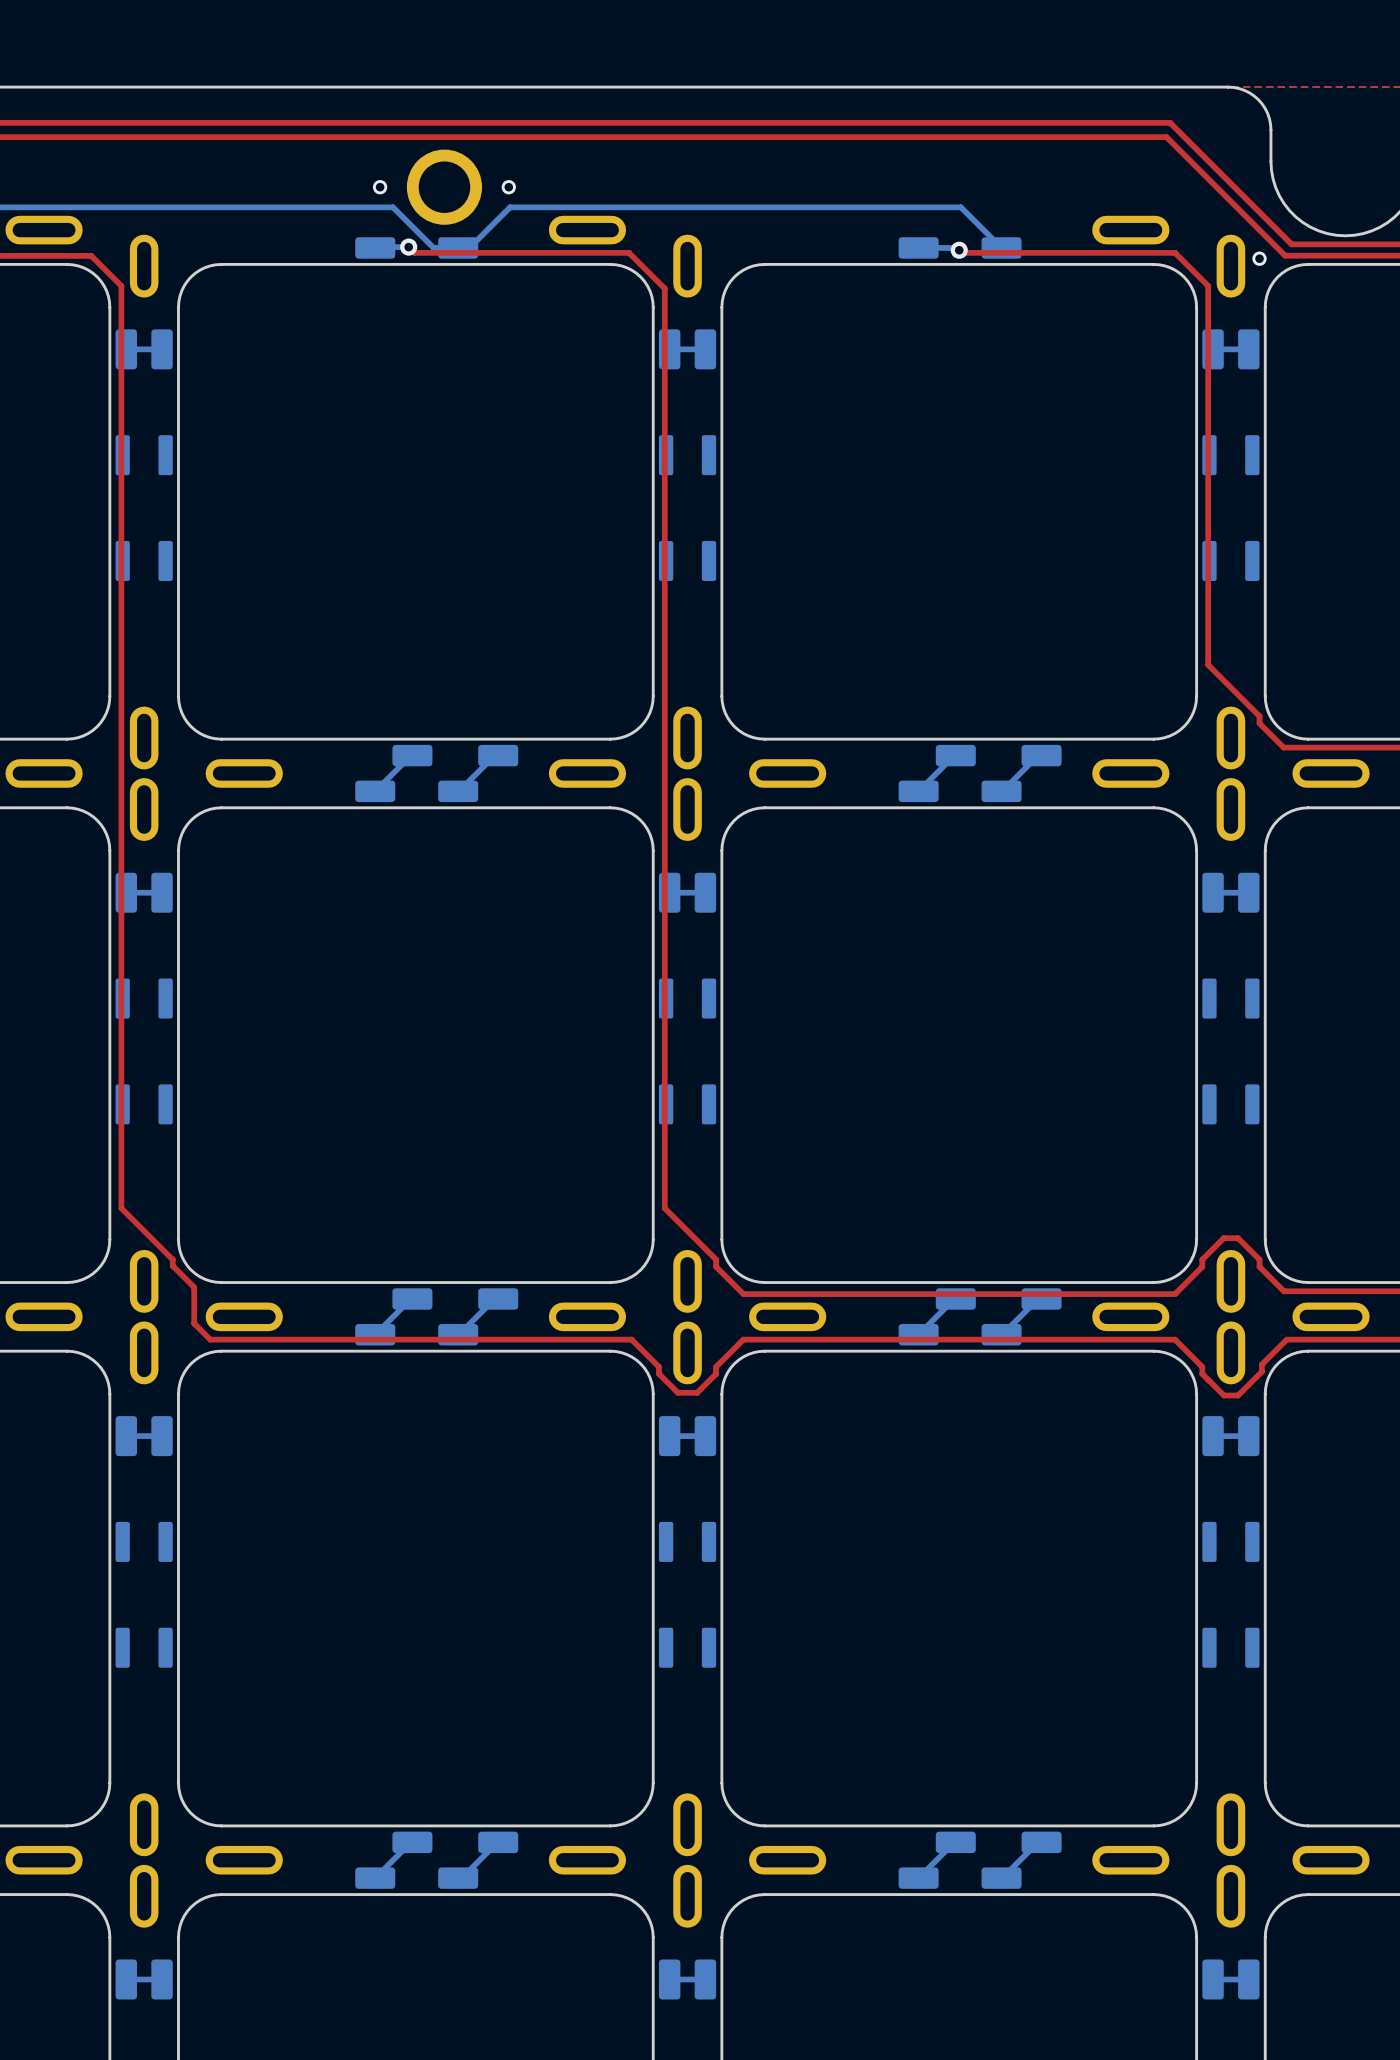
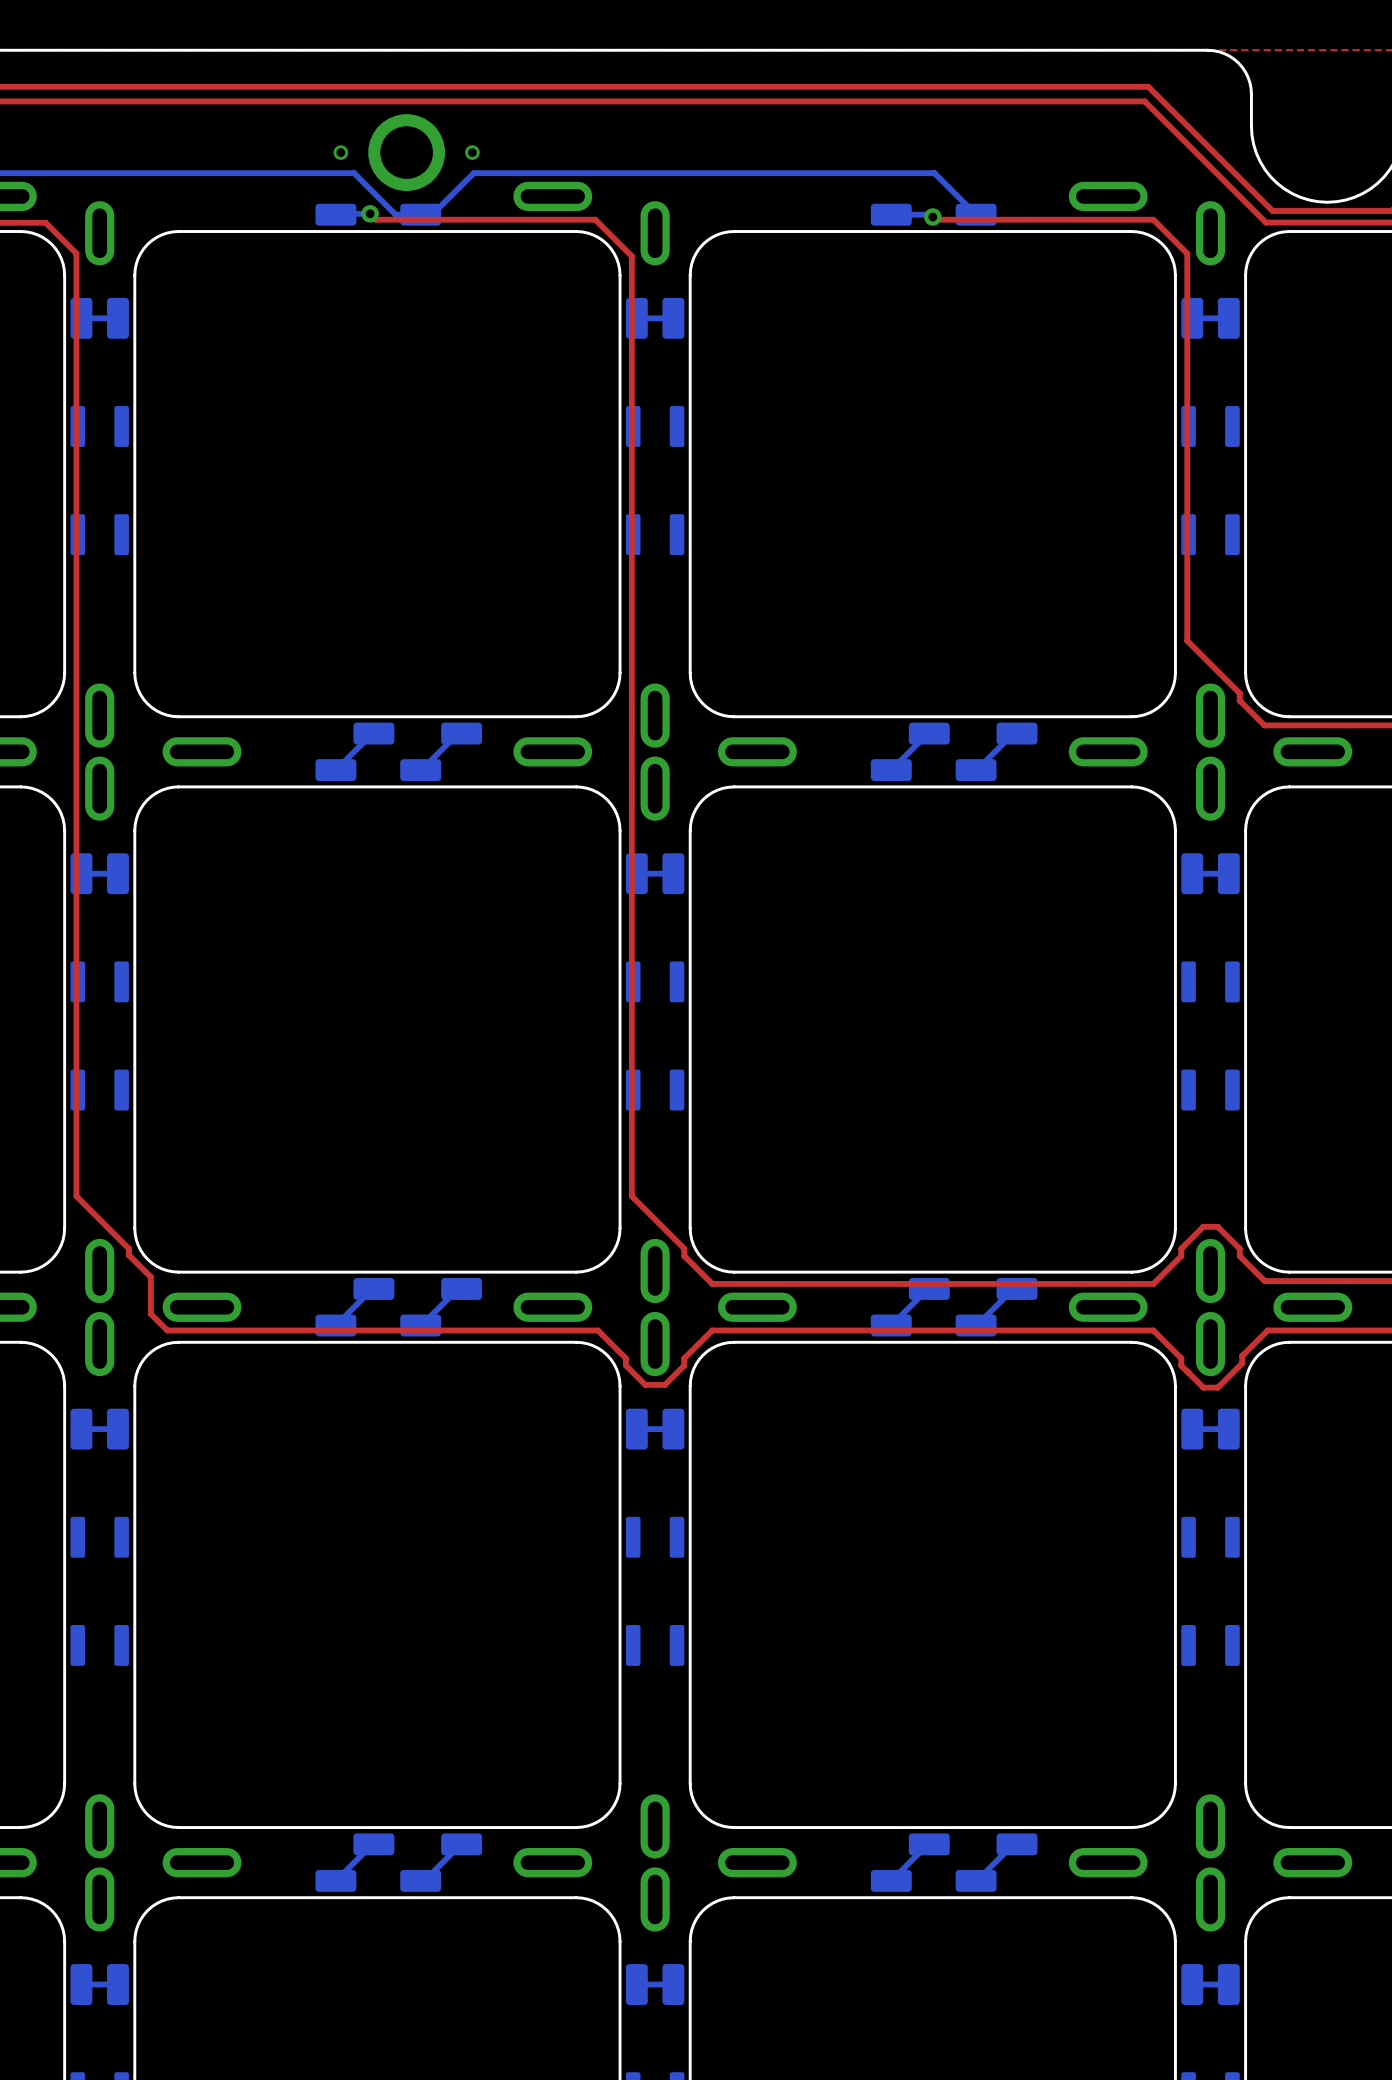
via: (1259, 258) -> none

